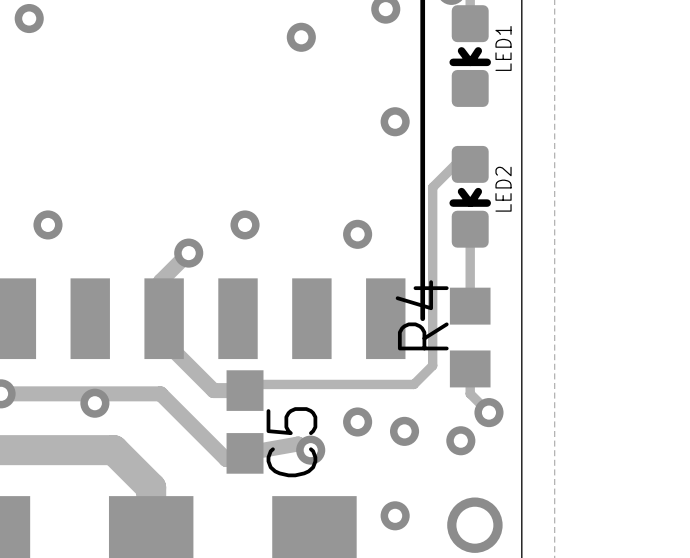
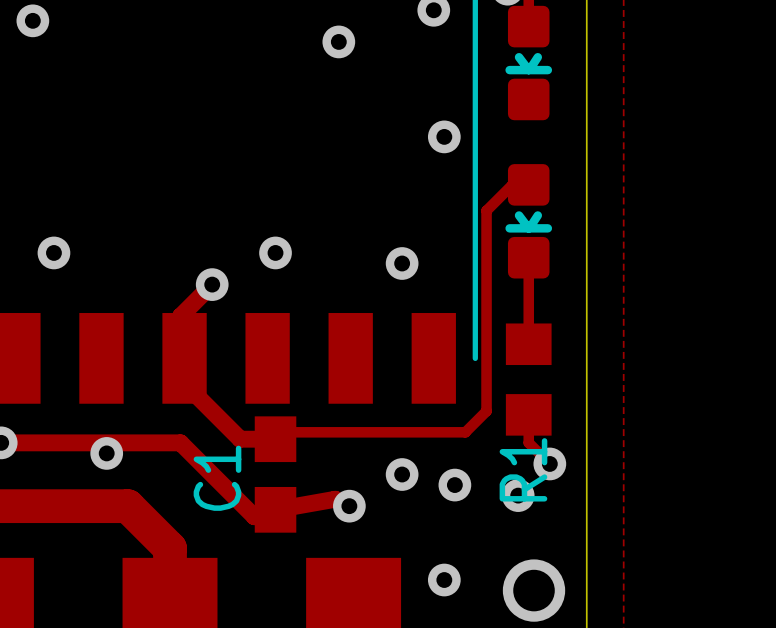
LED1 name: LED1 (503, 48) -> none
LED2 name: LED2 (503, 189) -> none
R4 name: R4 (422, 315) -> R1 (523, 469)
C5 name: C5 (291, 442) -> C1 (217, 478)

